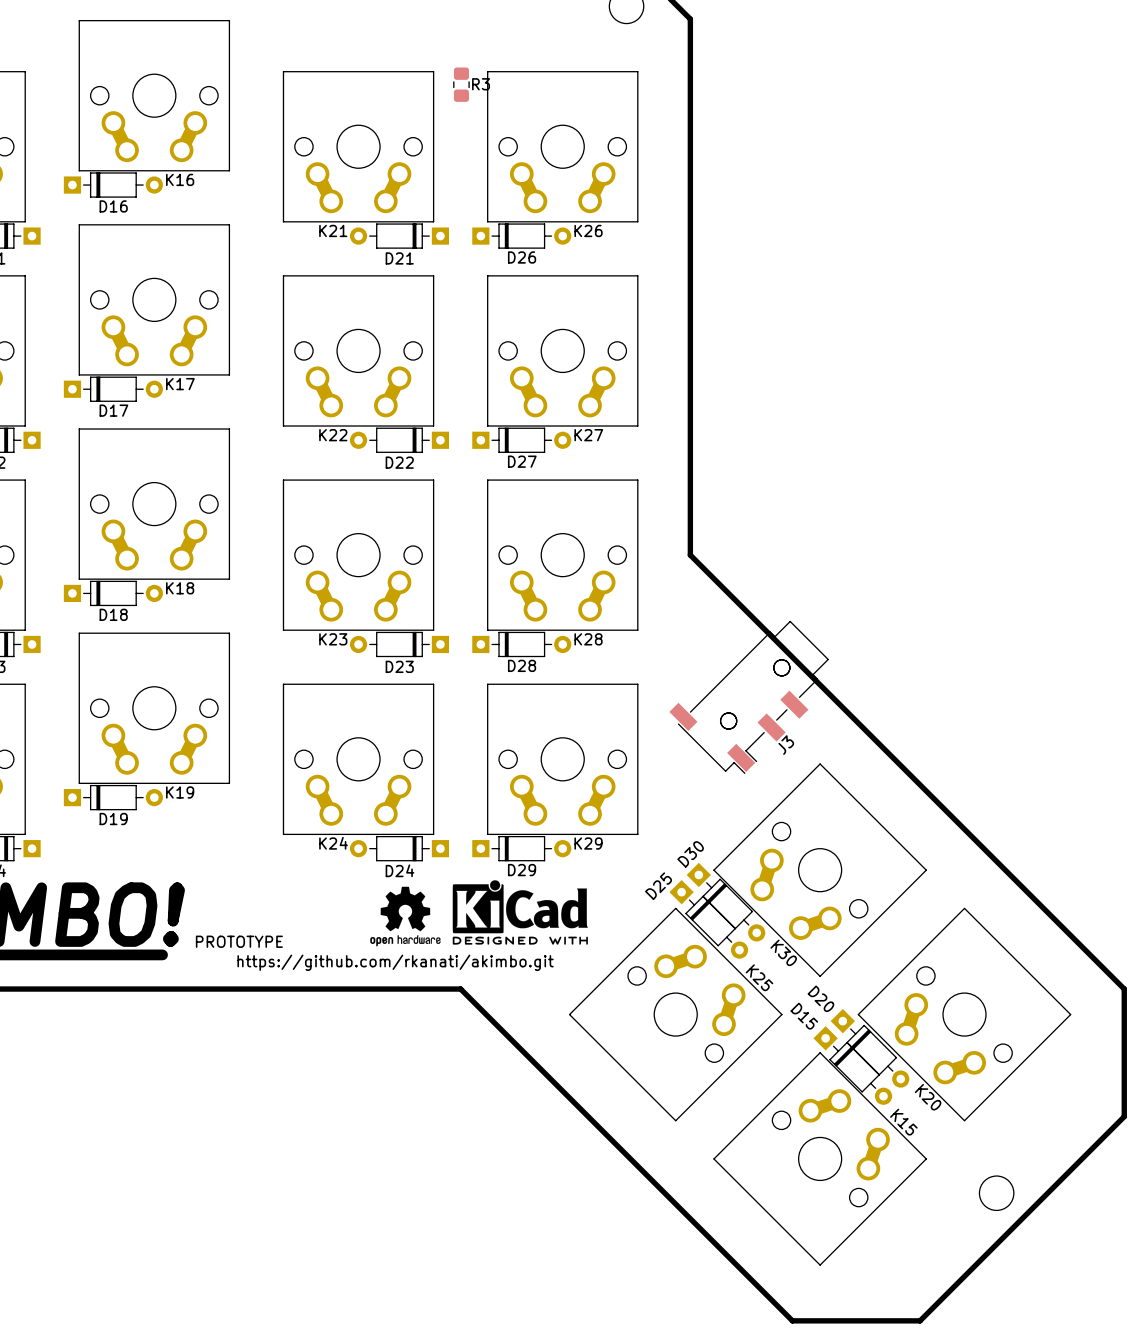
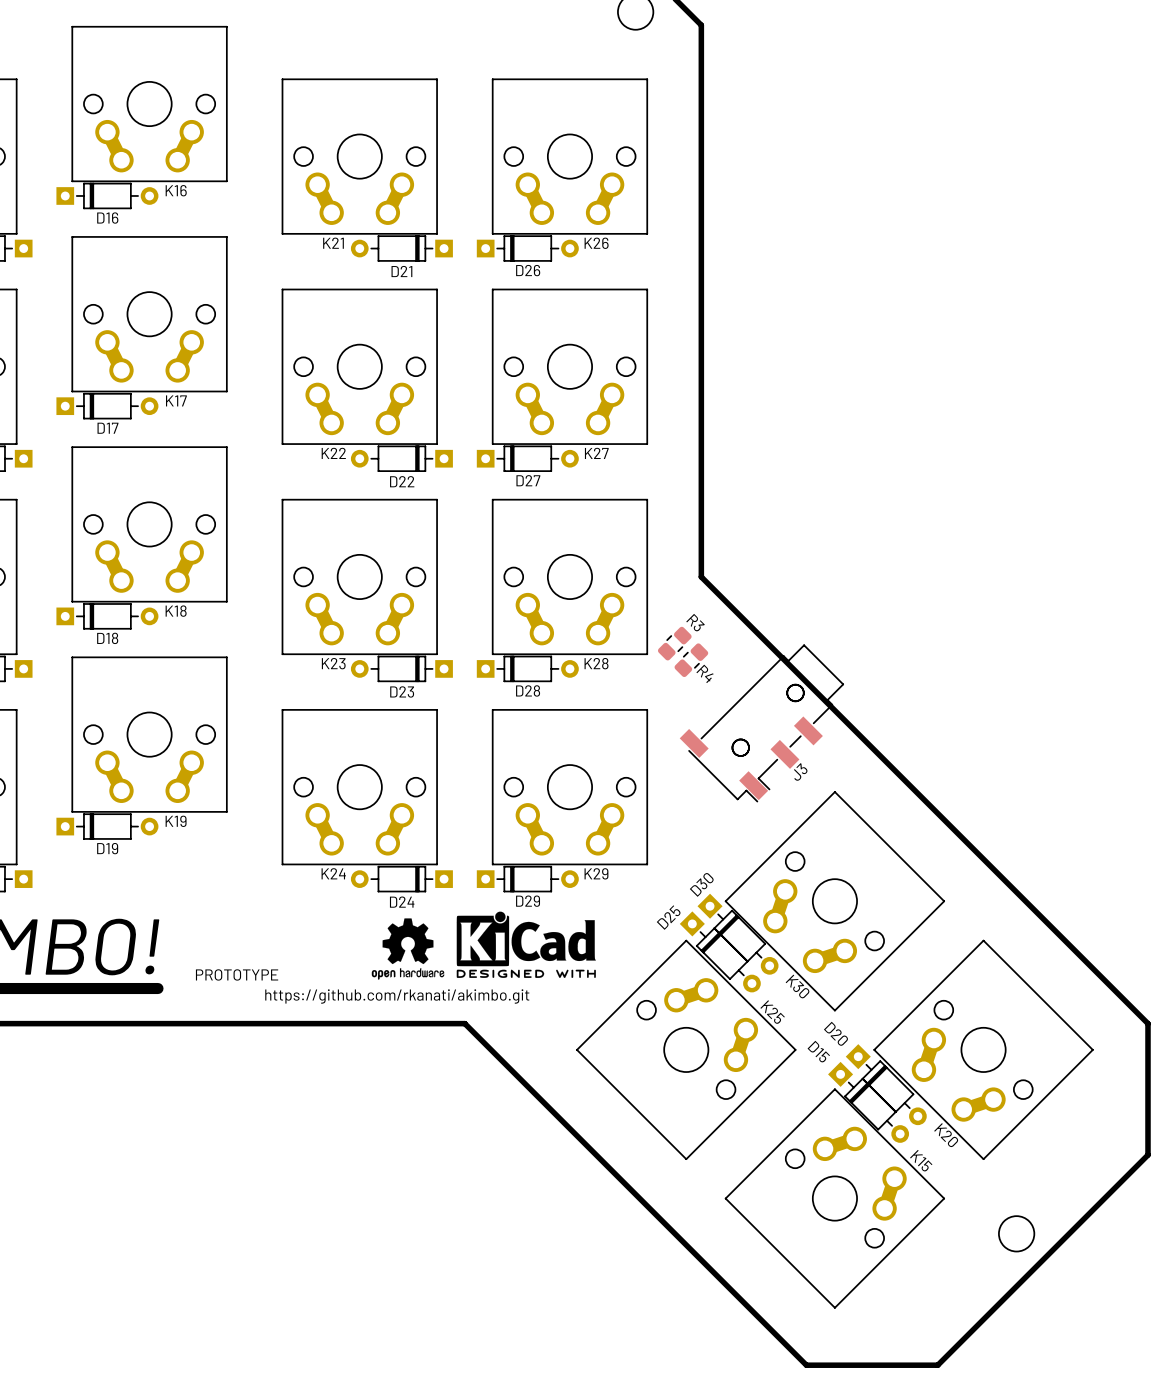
R3 rotation: 0° (461, 84) -> 45° clockwise (674, 643)
R3 position: (461, 84) -> (674, 643)
R4: none -> (691, 660)

